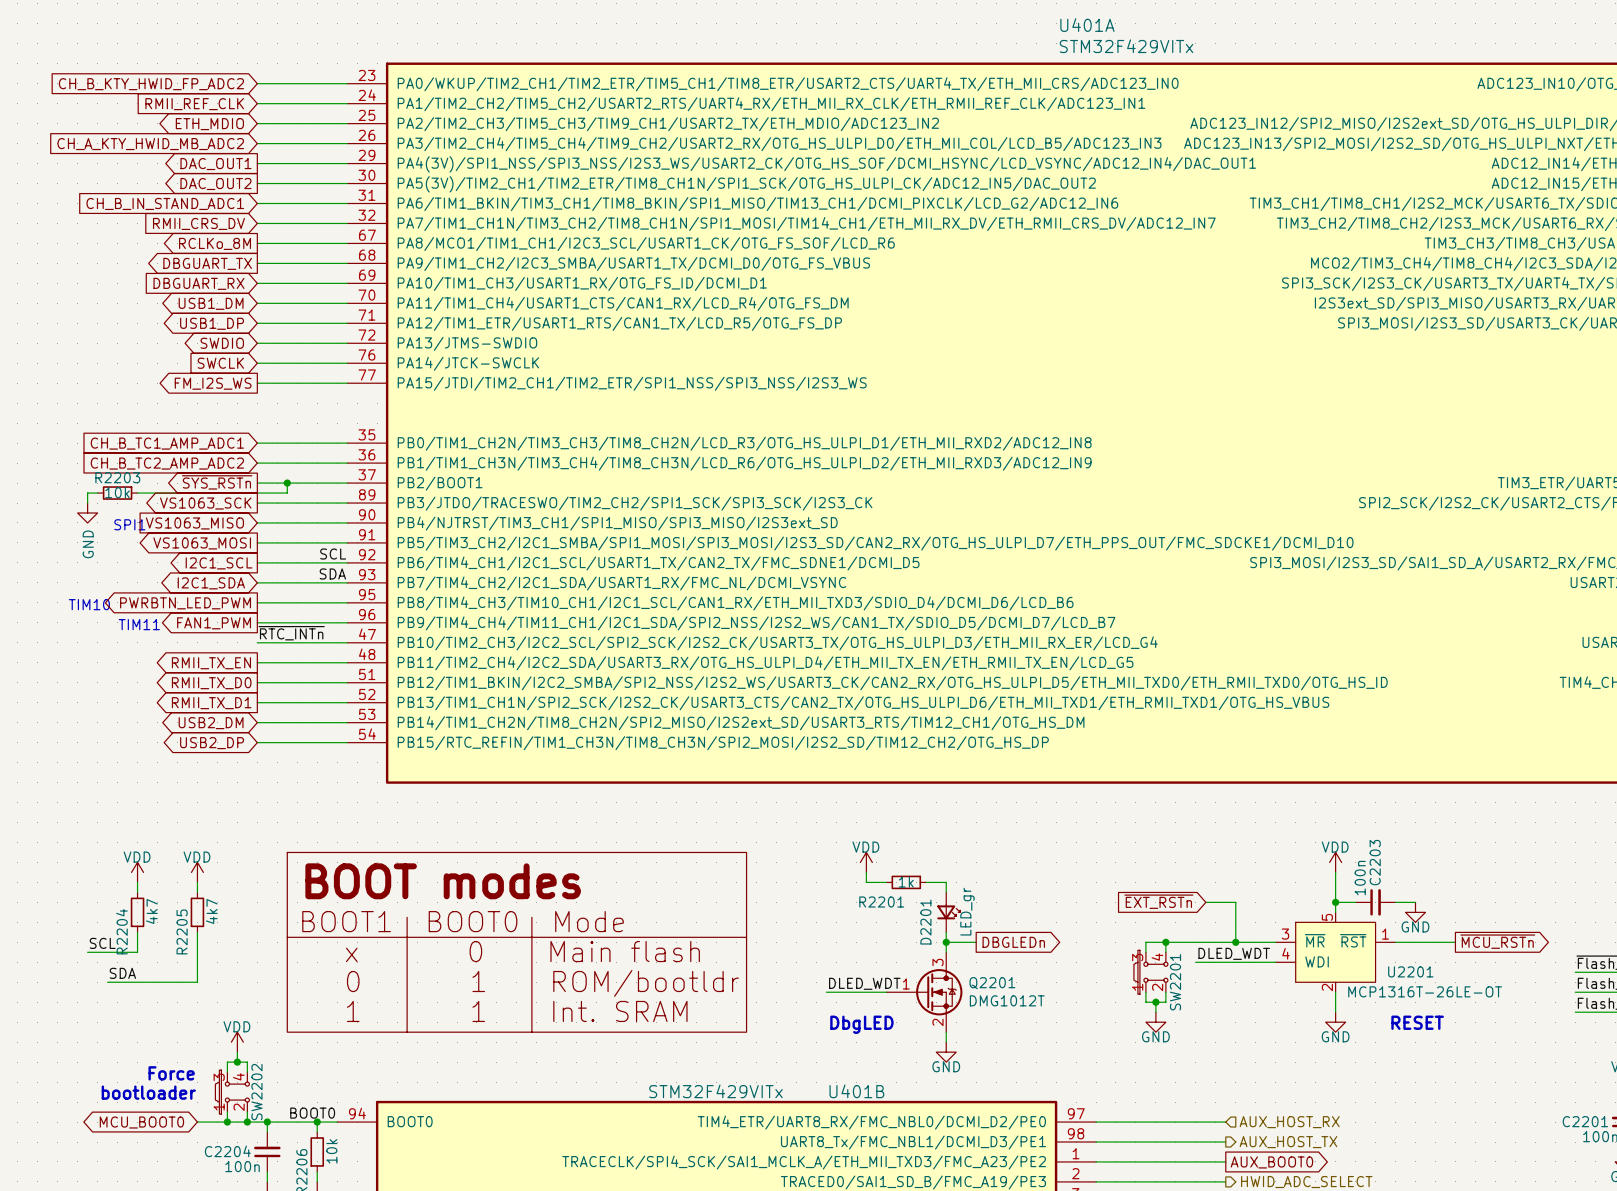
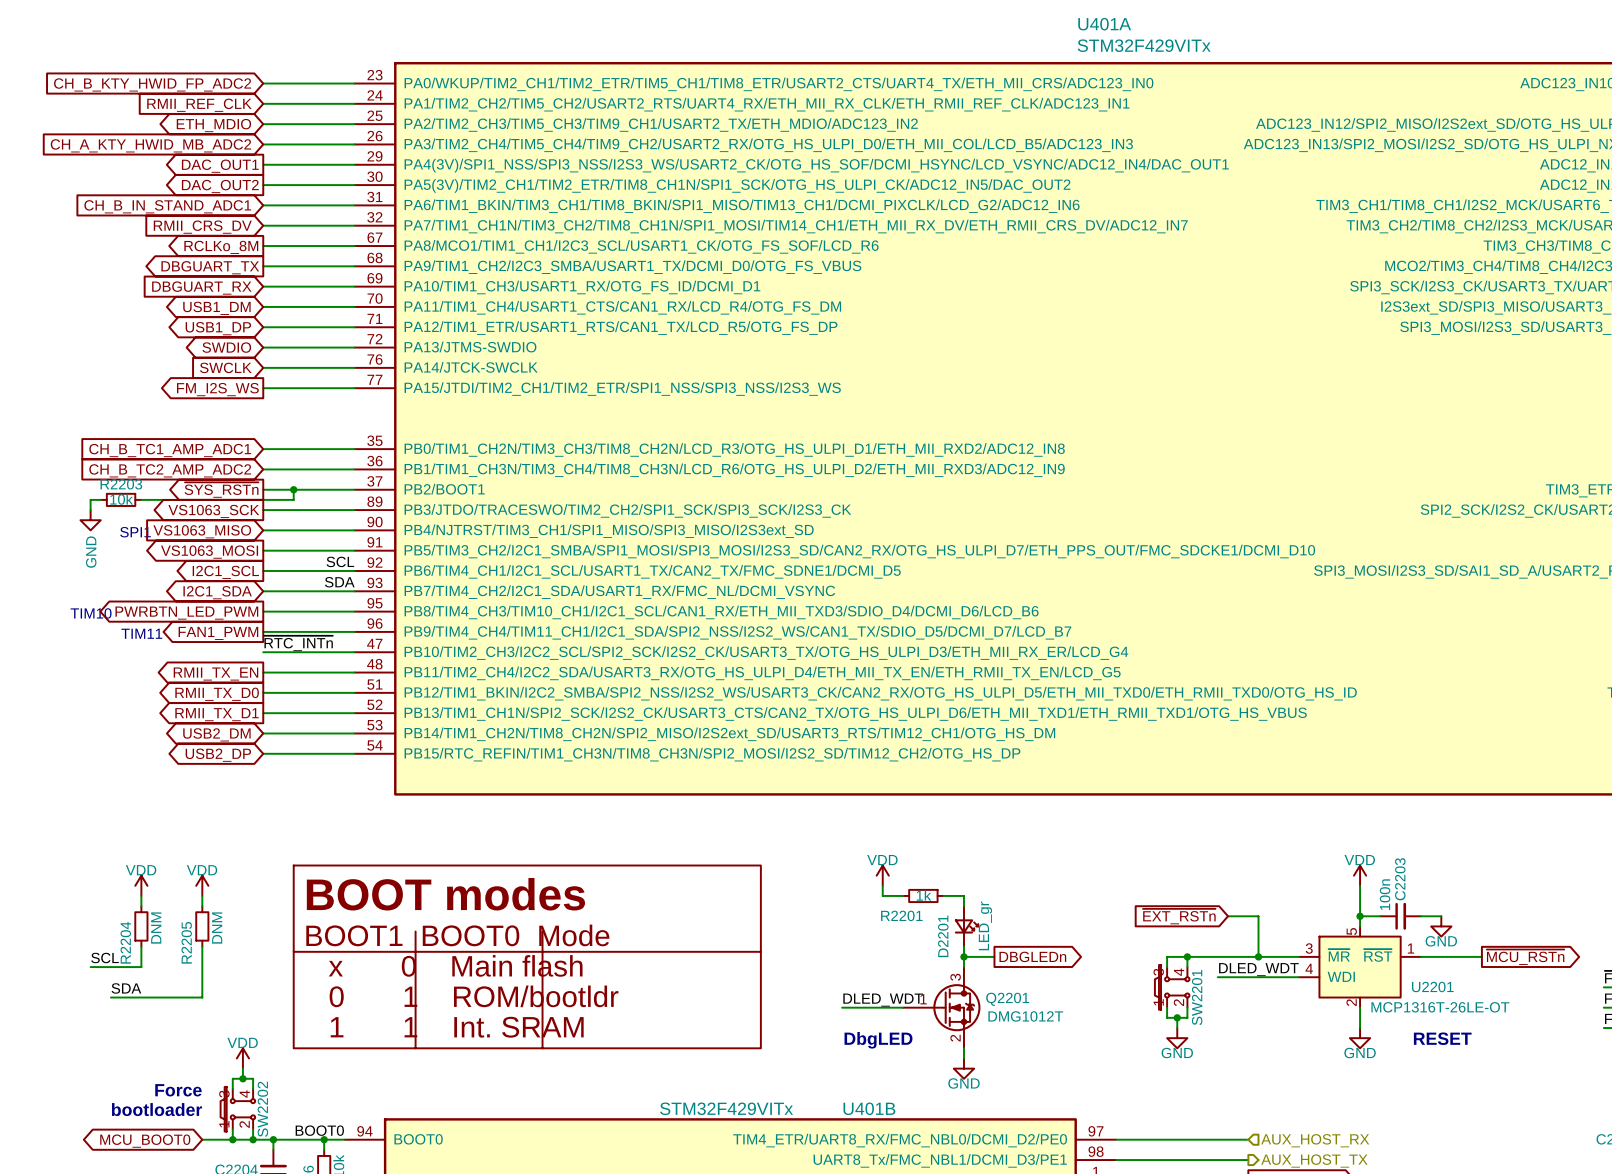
R2204 value: 4k7 (151, 911) -> DNM (156, 928)
R2205 value: 4k7 (211, 911) -> DNM (217, 928)

